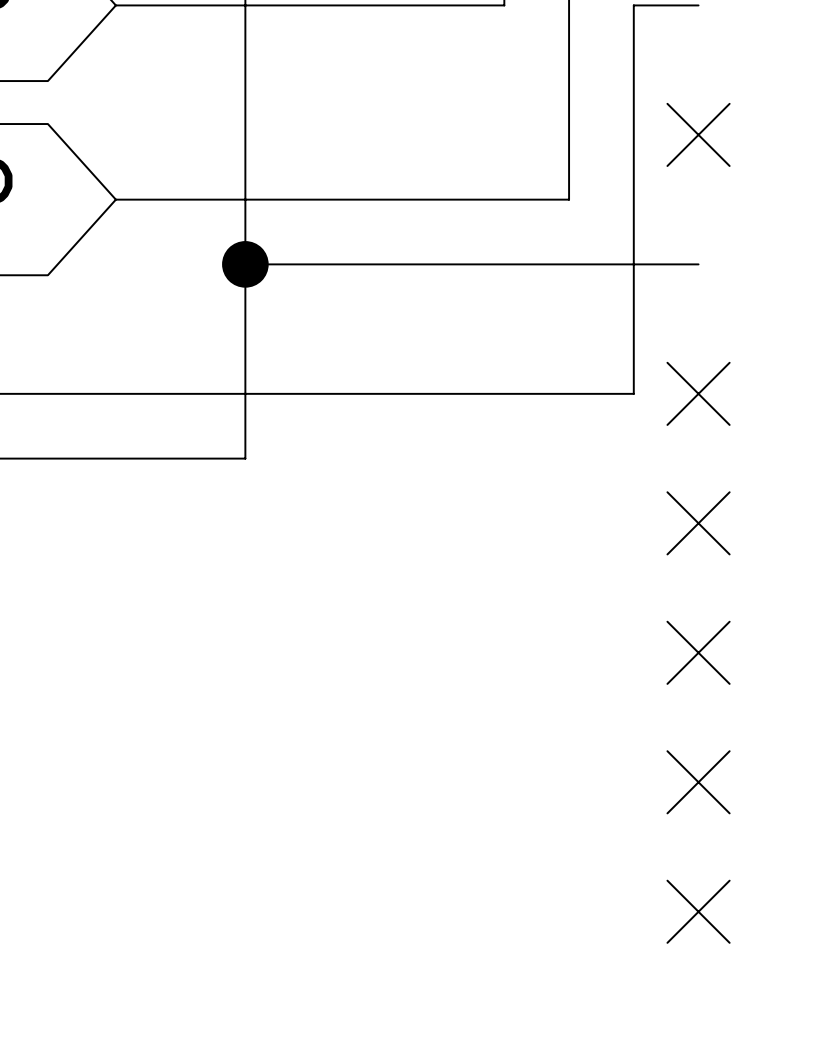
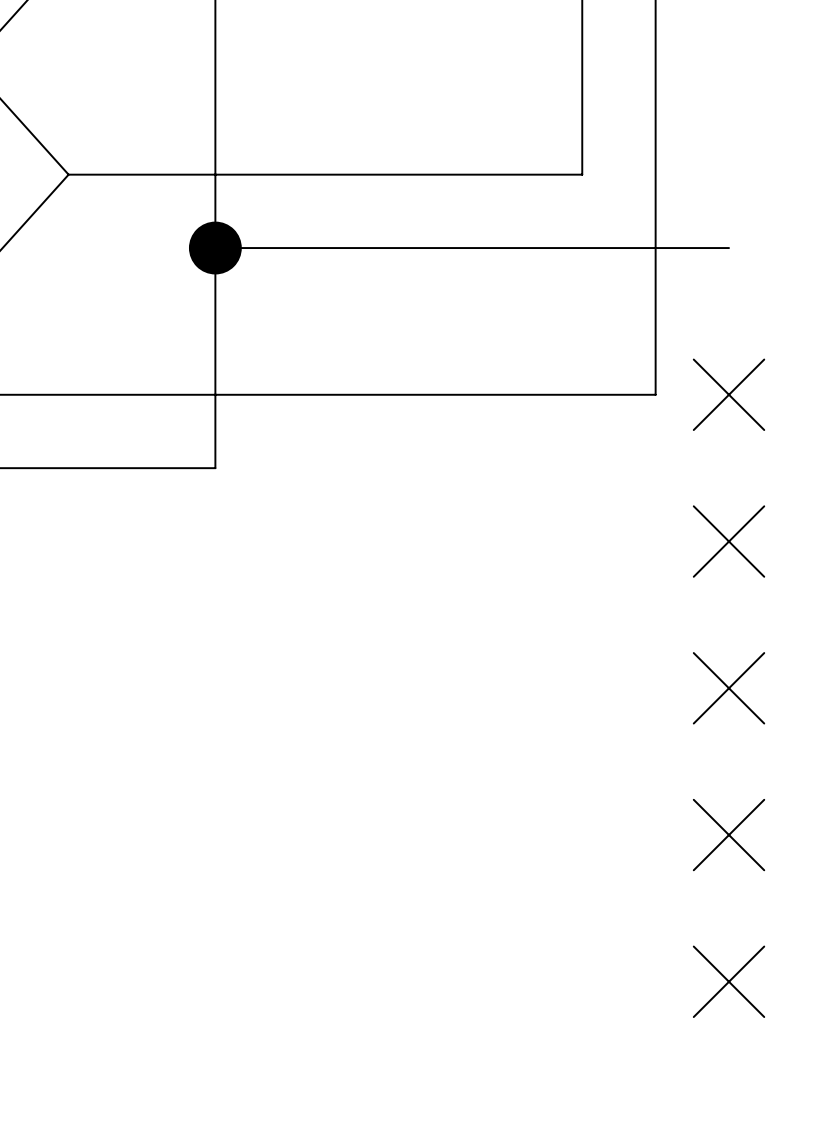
no-connect mark: (698, 134) -> none

